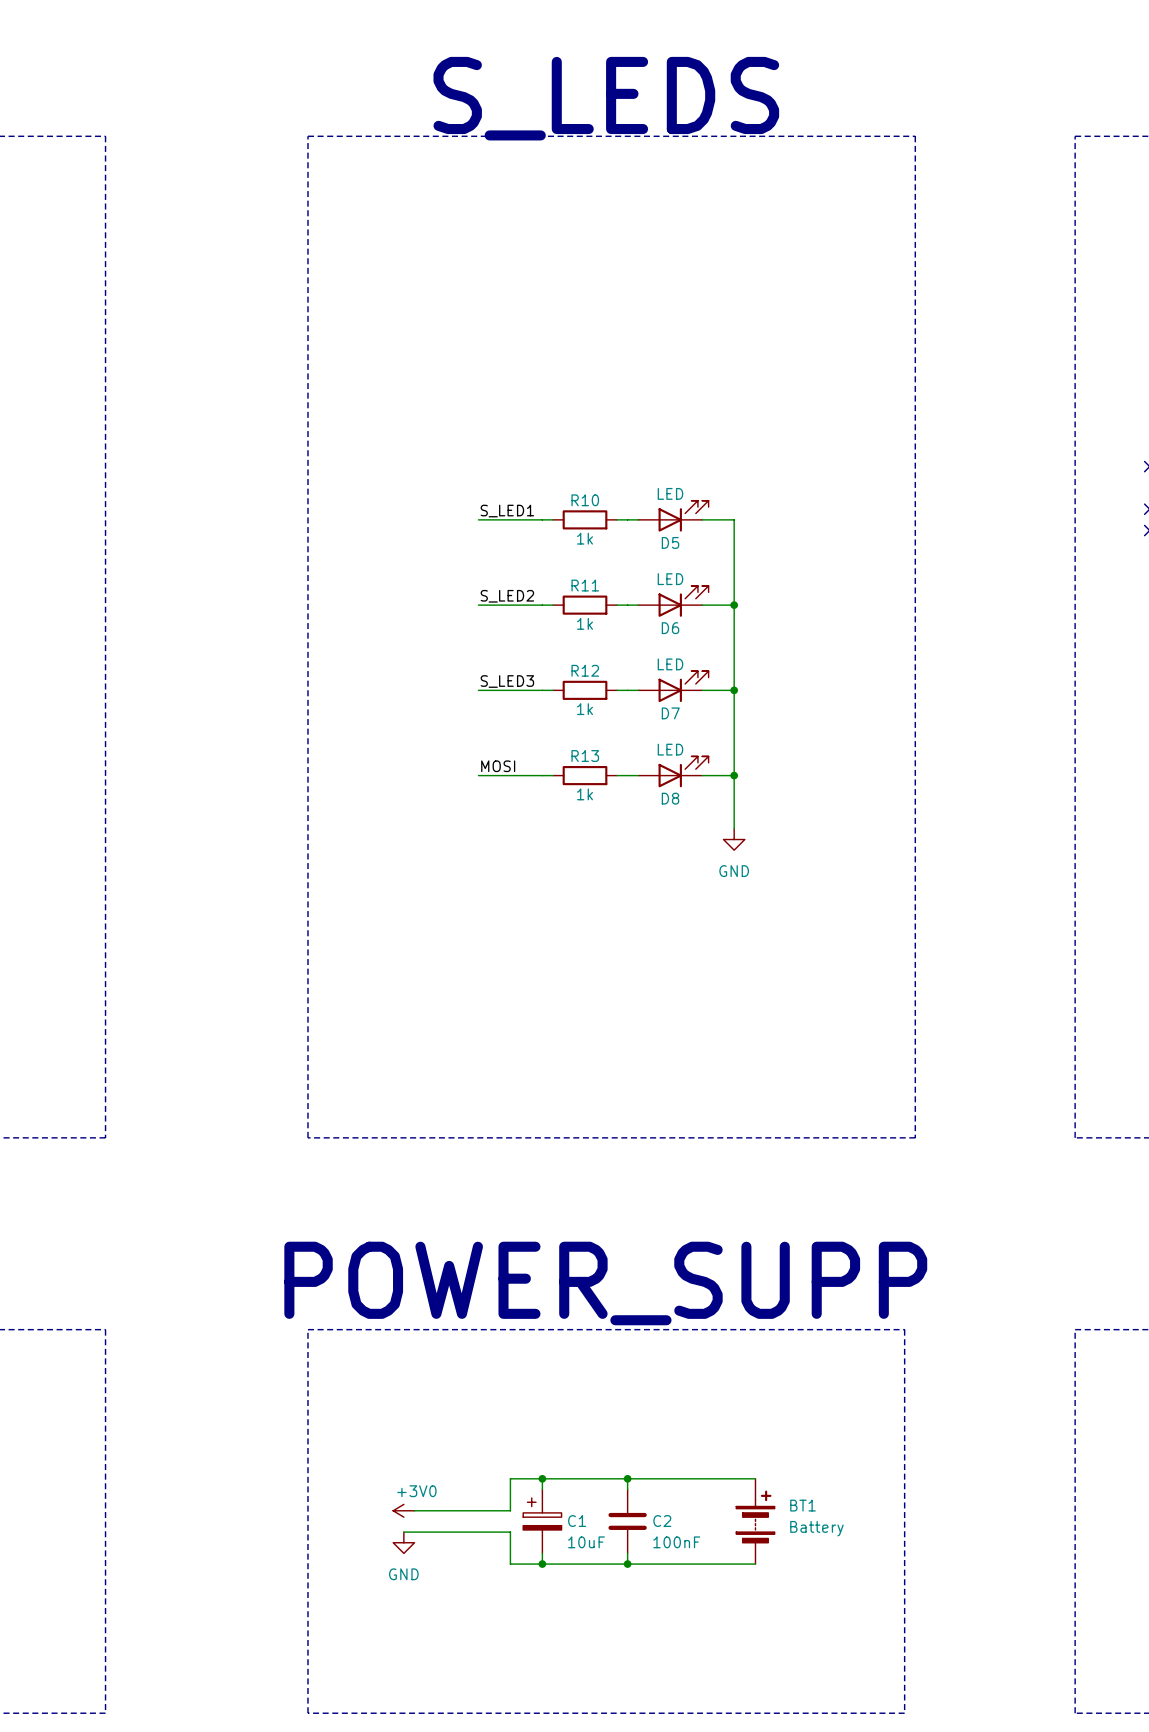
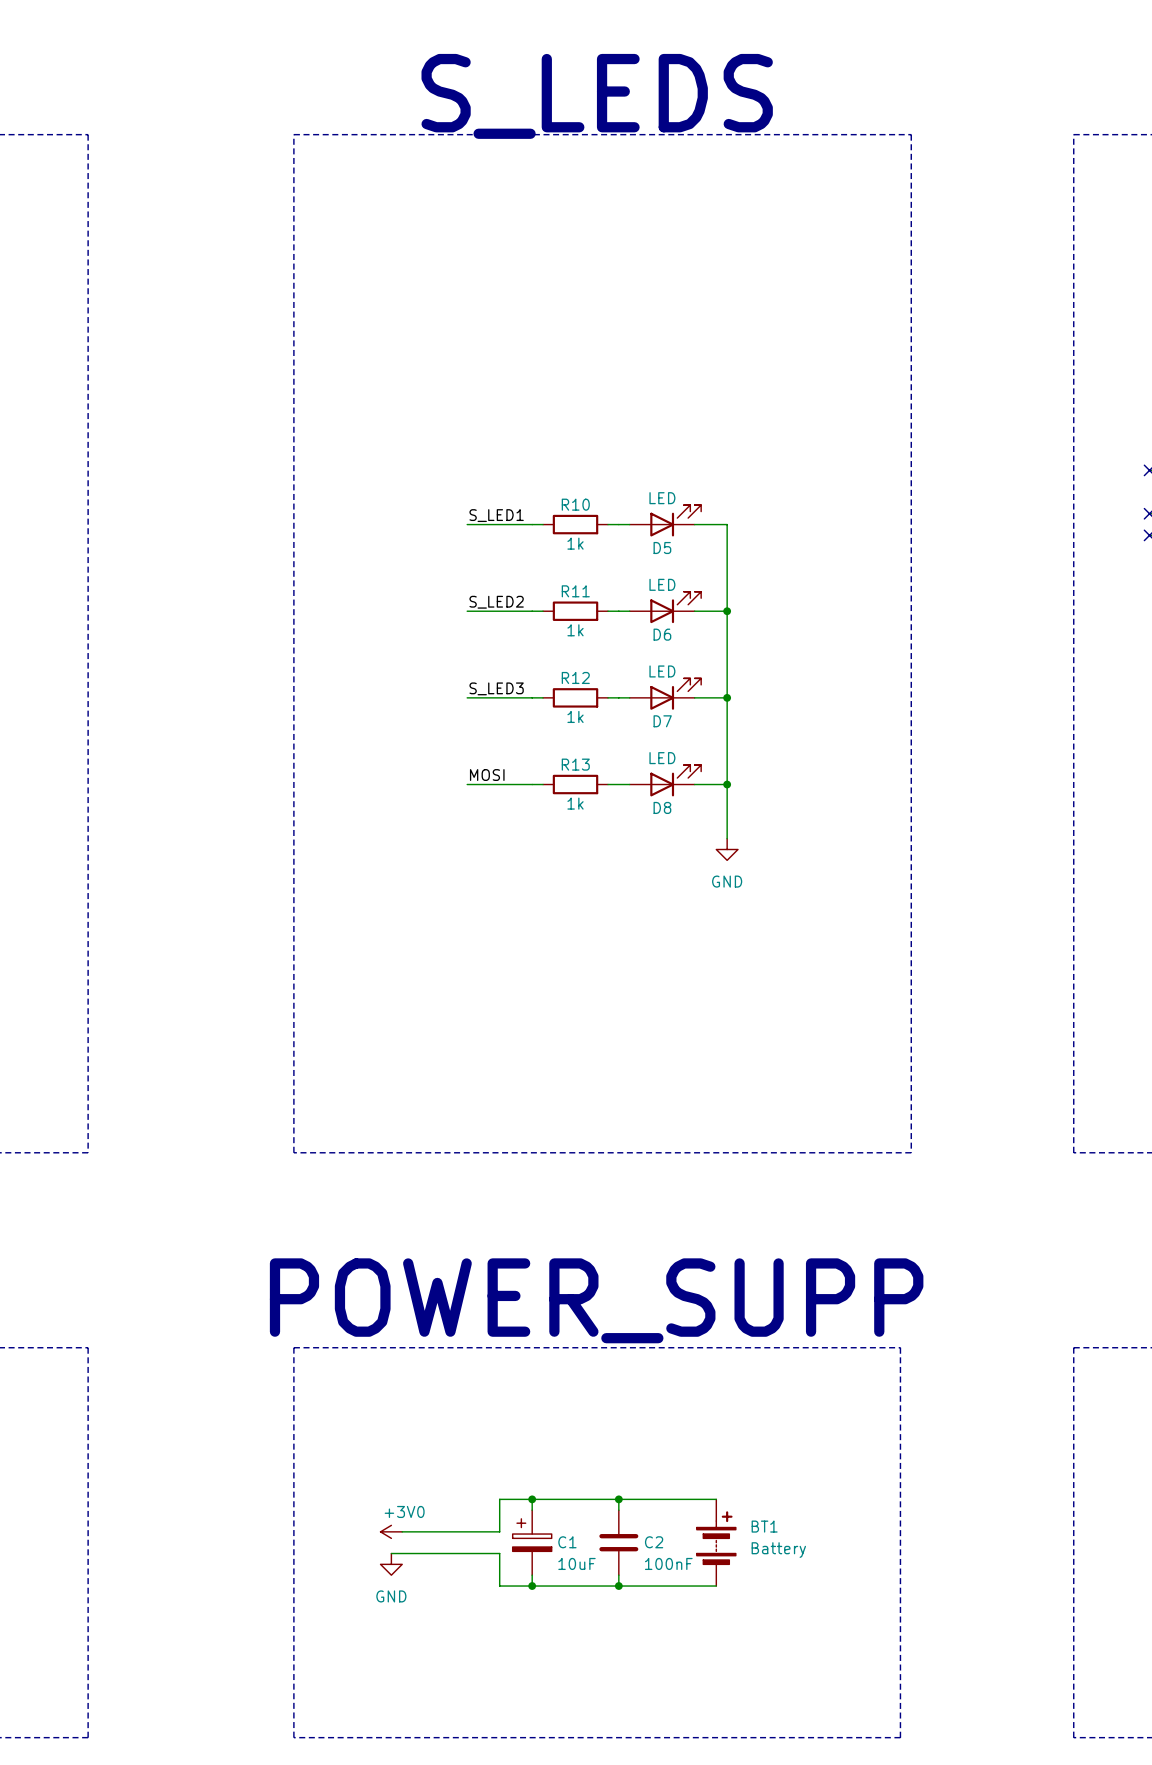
wire: (723, 1478) (755, 1478) -> none
BT1 position: (755, 1521) -> (716, 1542)
wire: (723, 1564) (755, 1564) -> none

